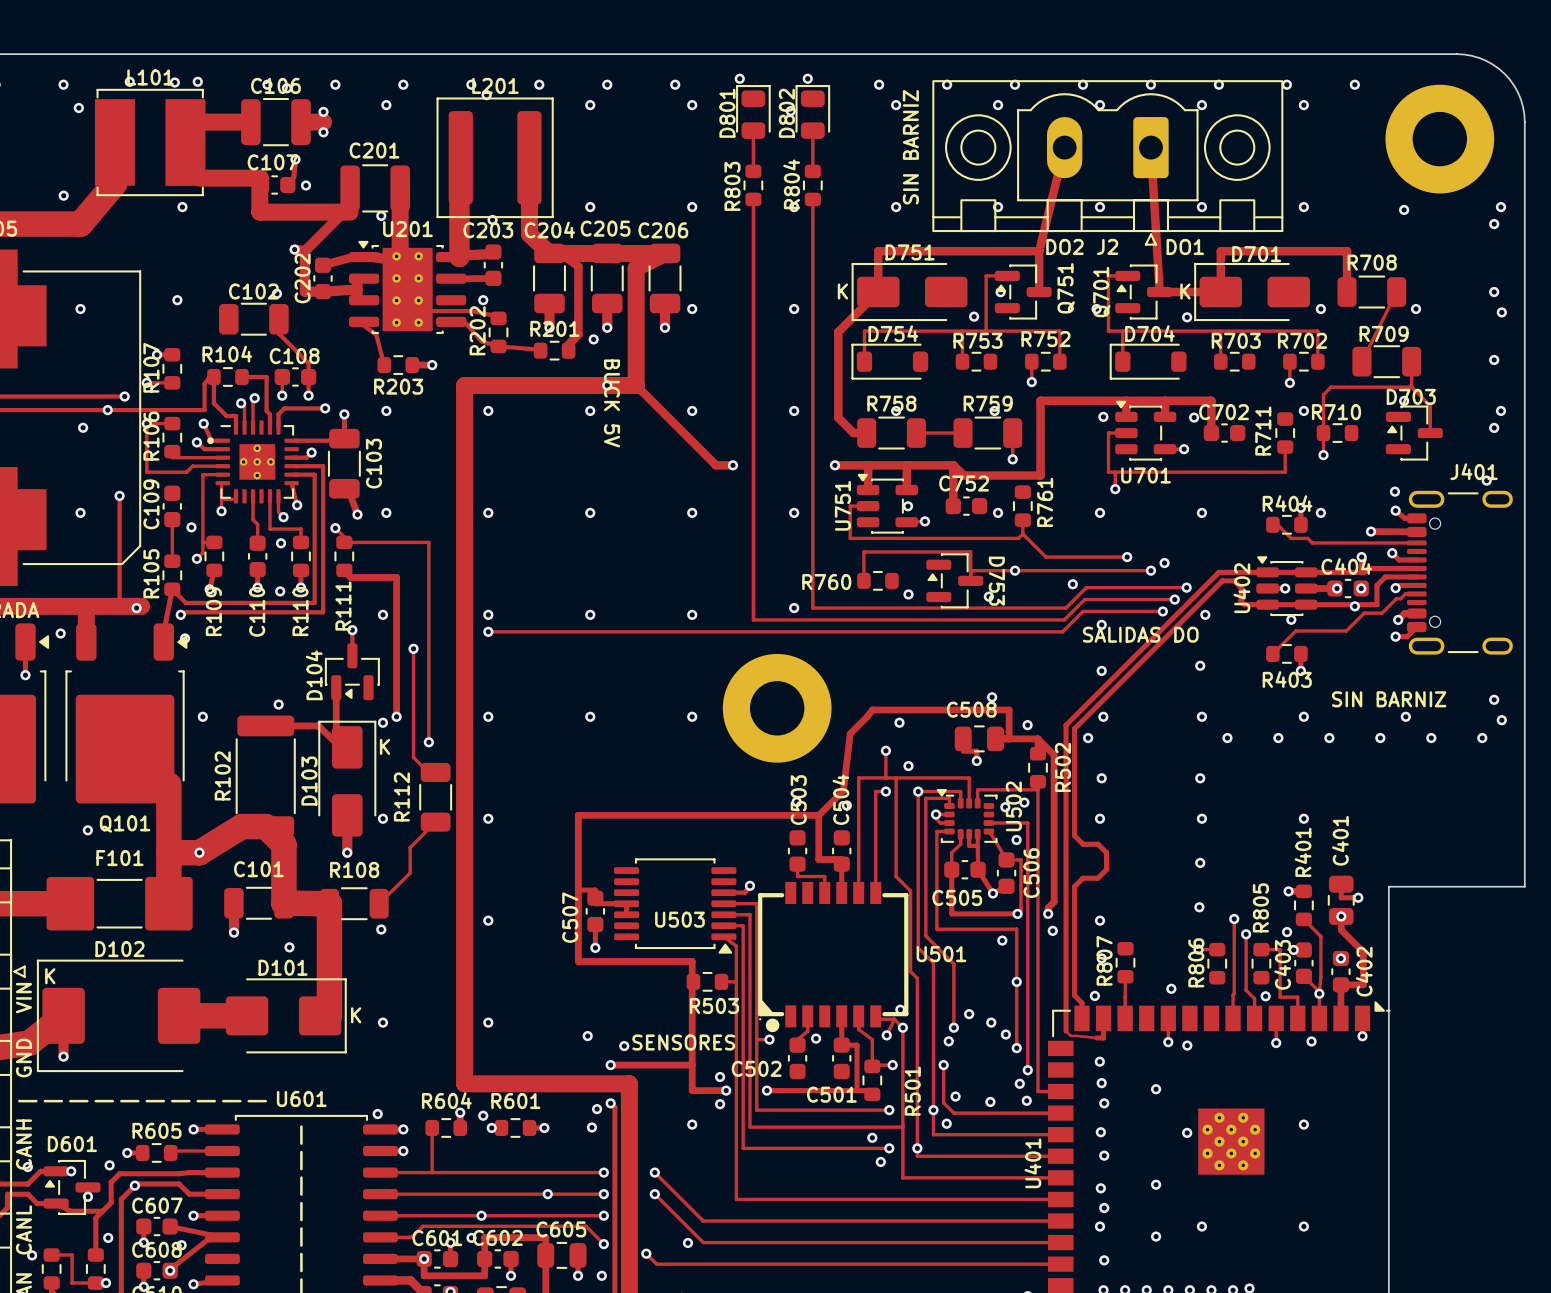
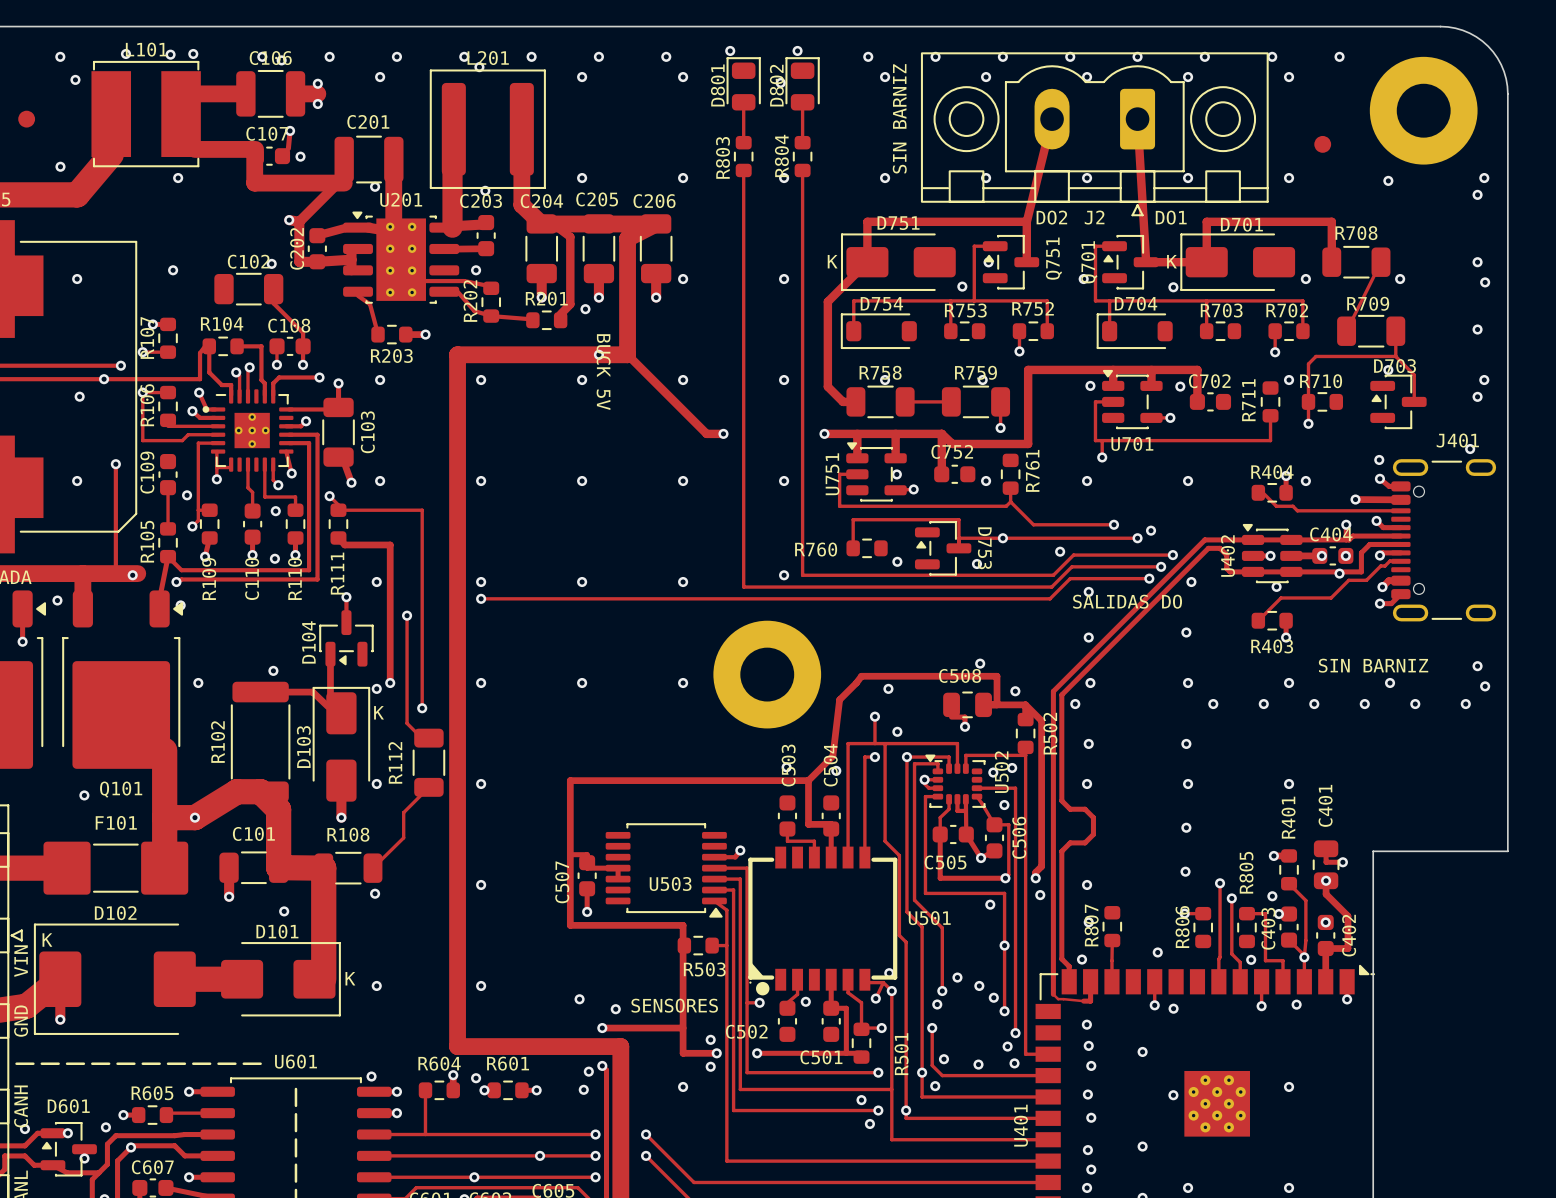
part: none -> (26, 119)
part: none -> (1322, 144)

